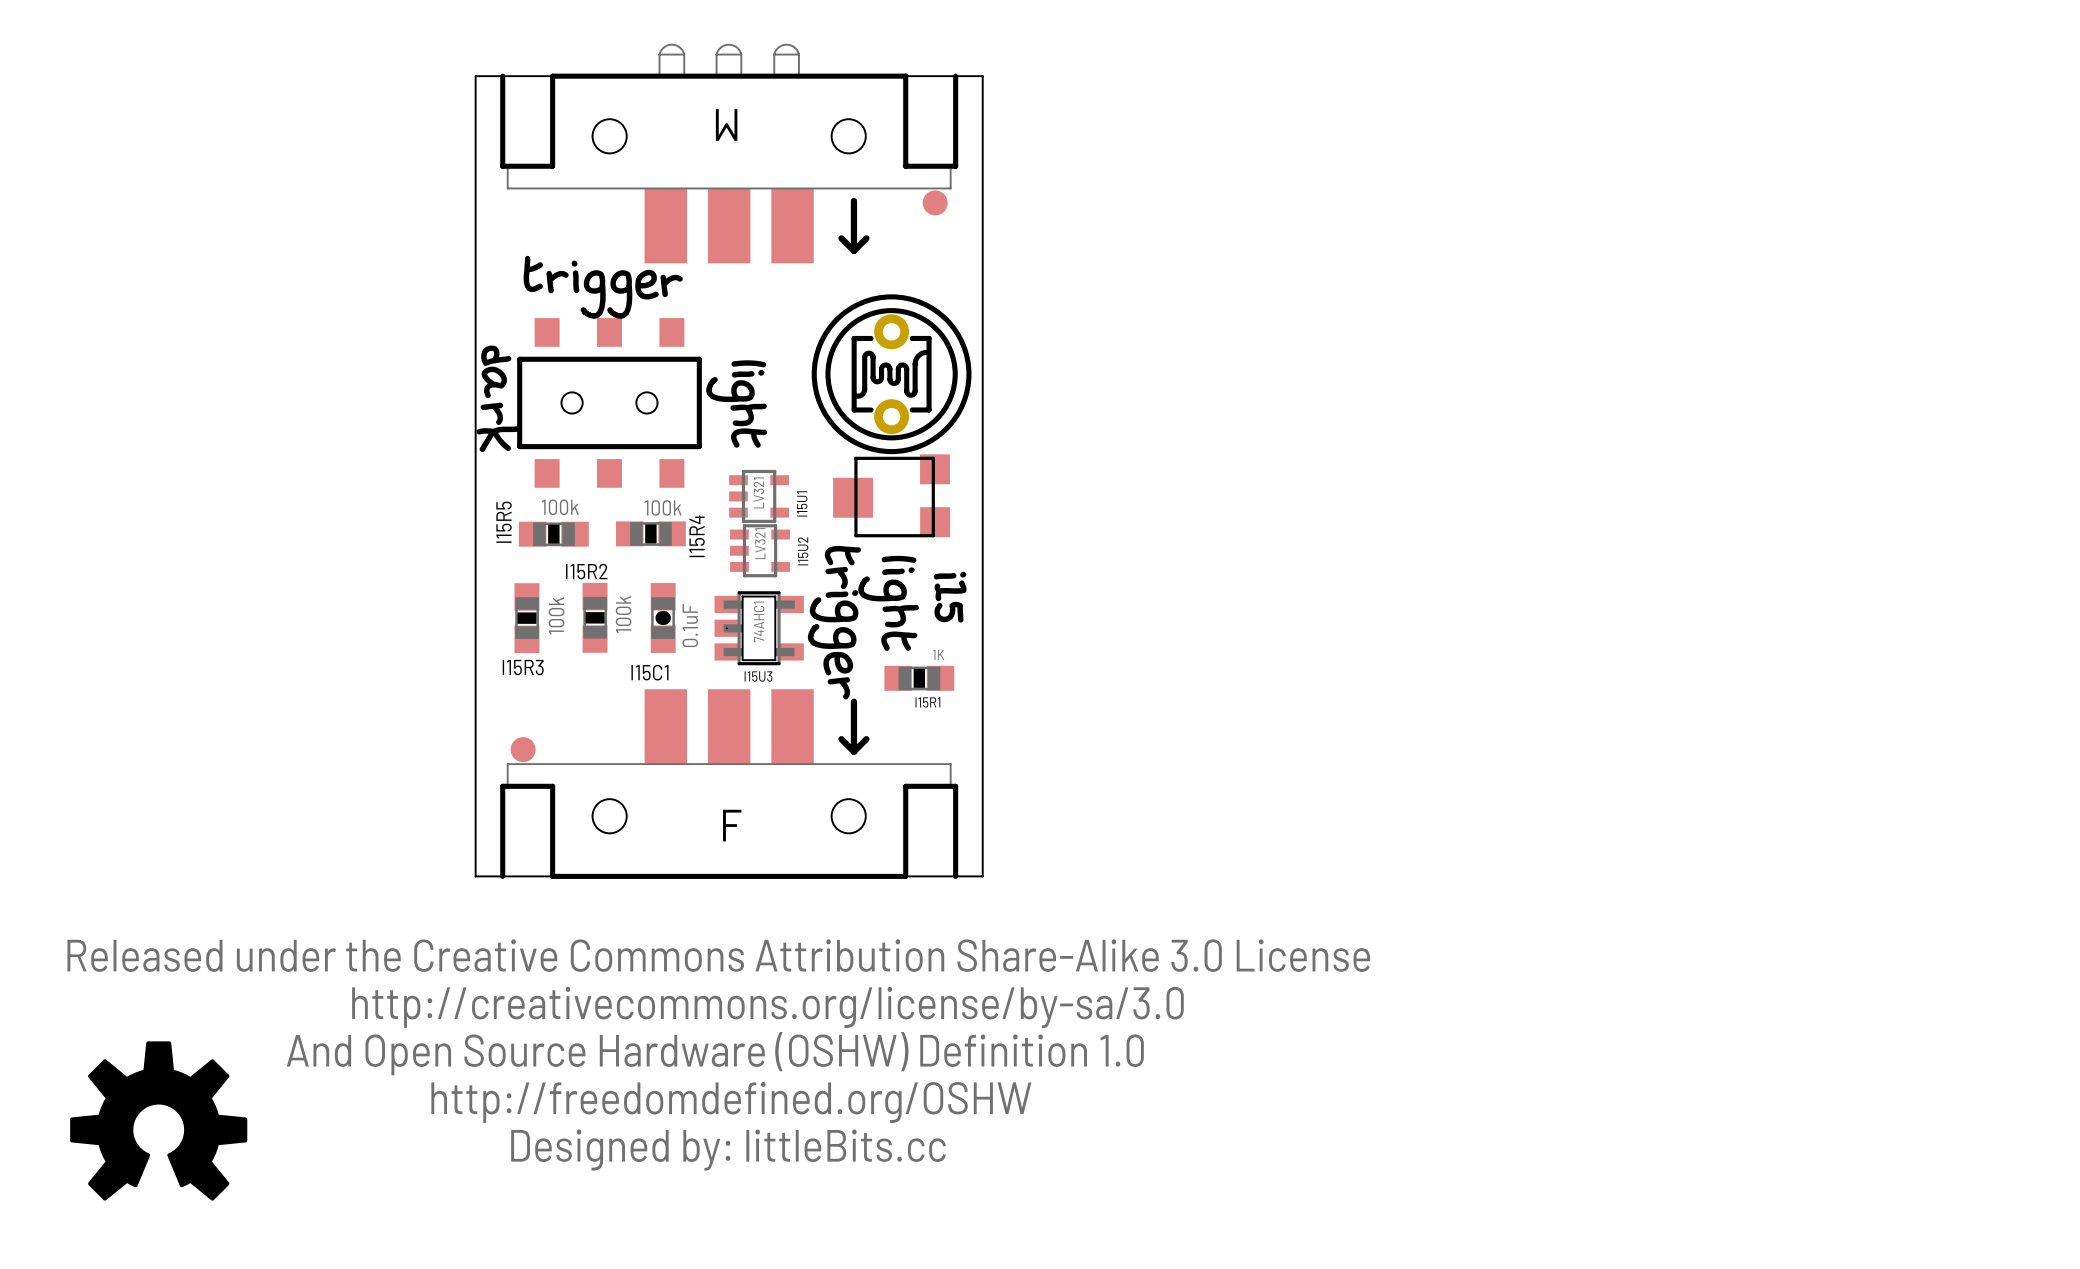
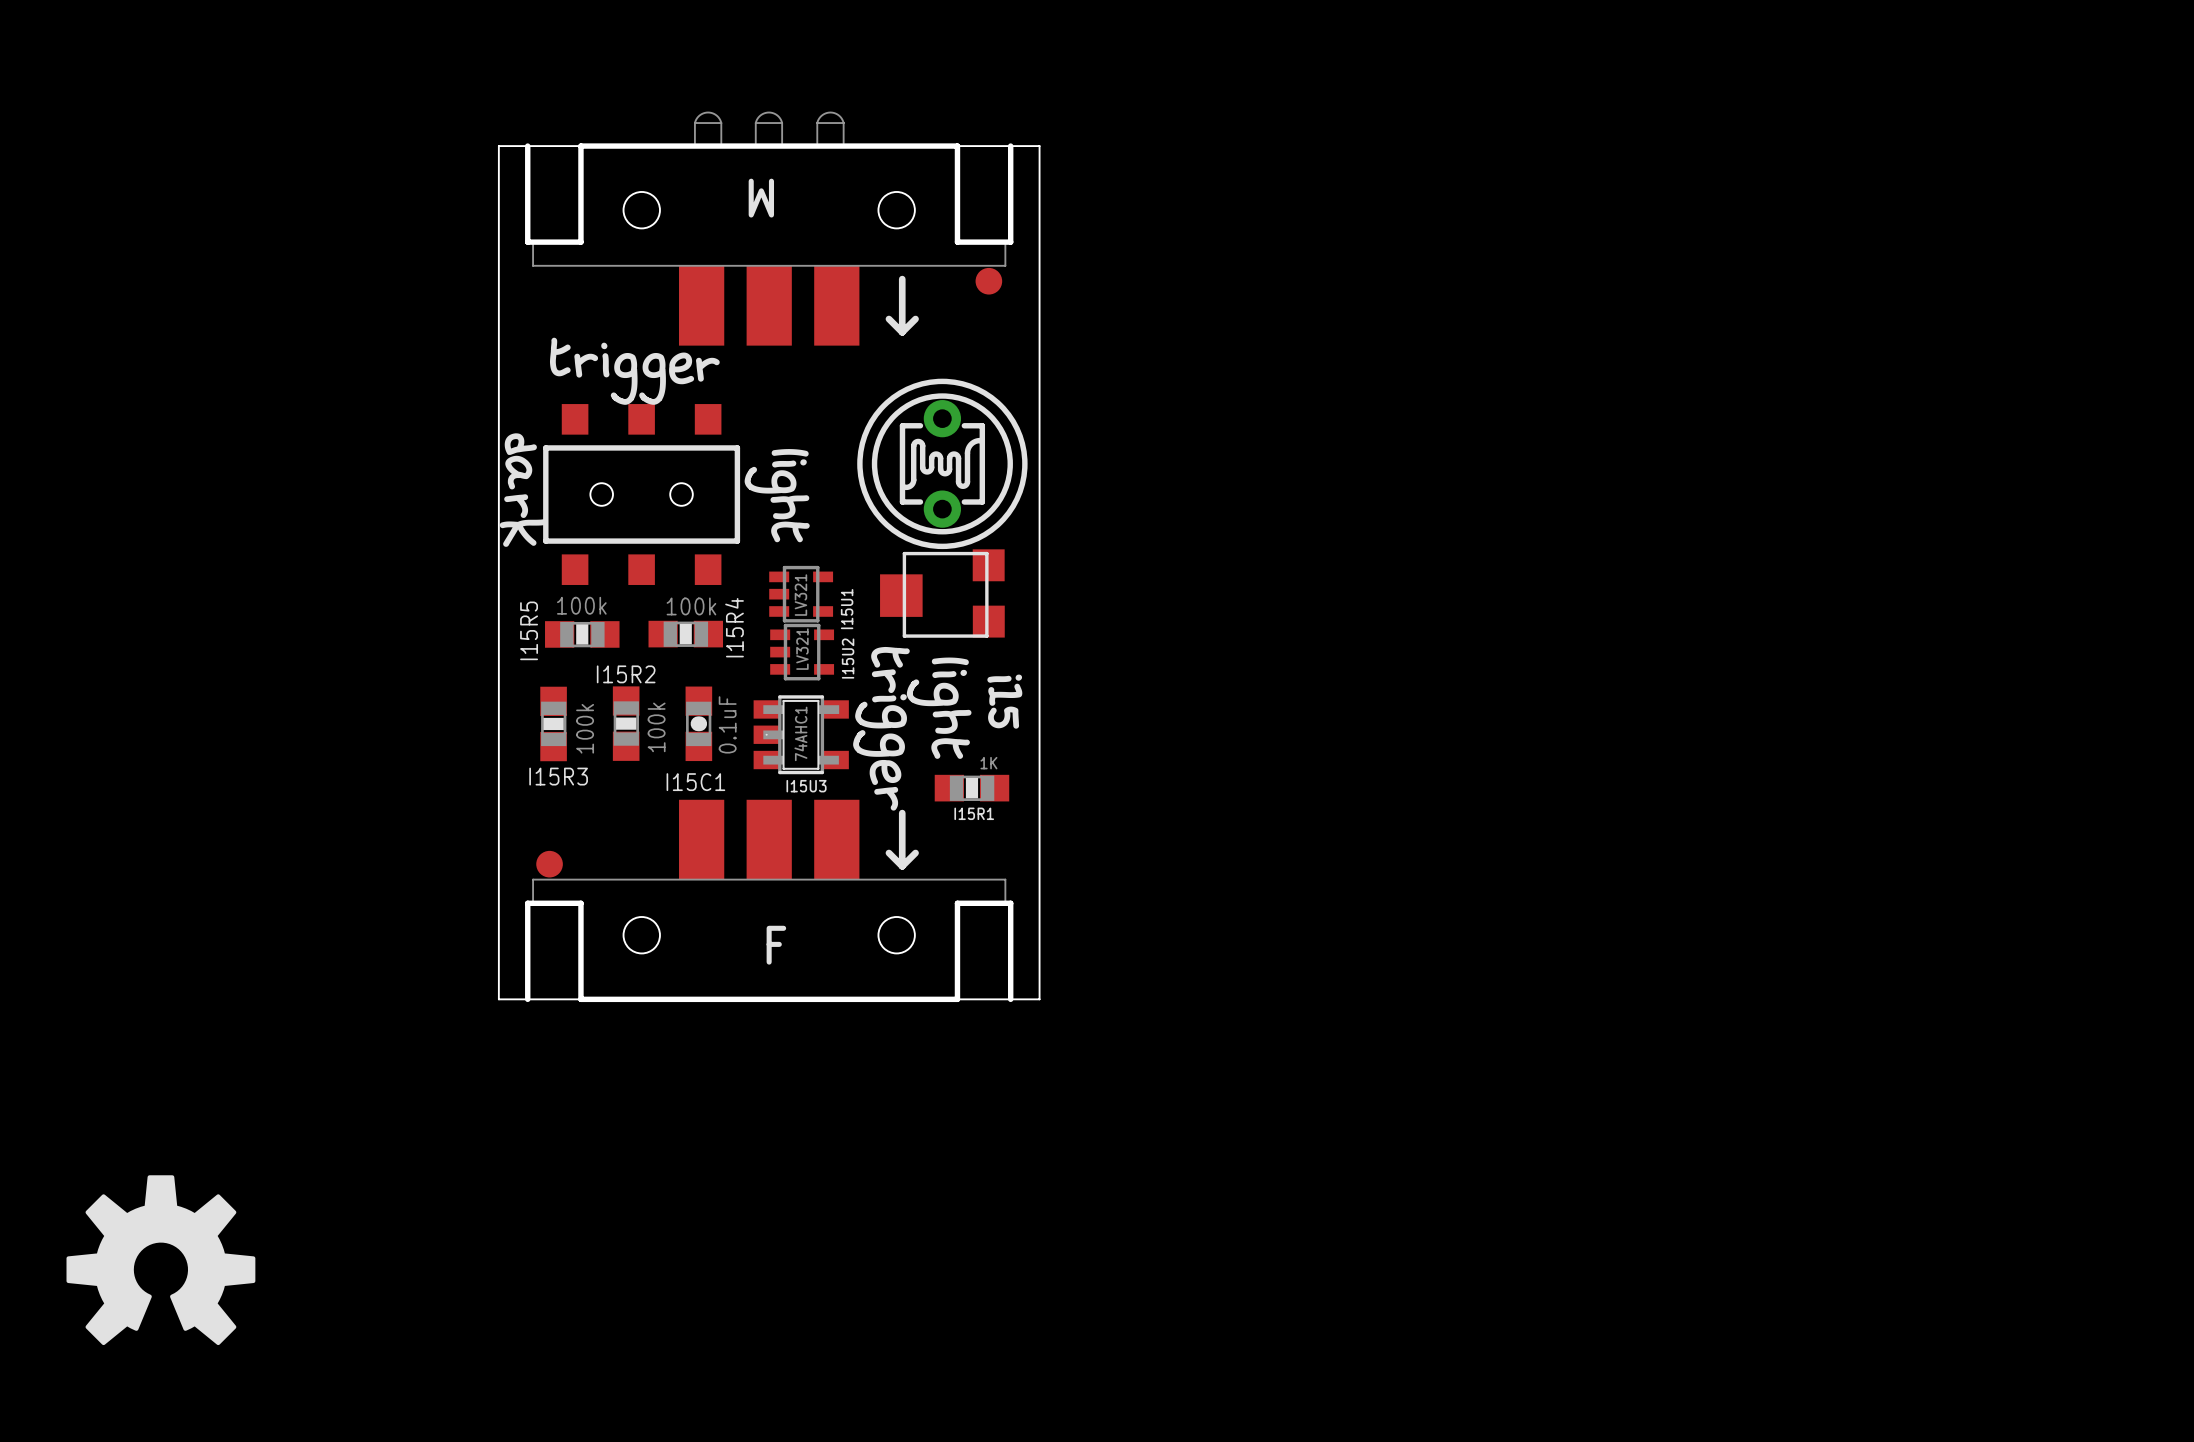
drawing: [67, 939, 1371, 1171] -> none

